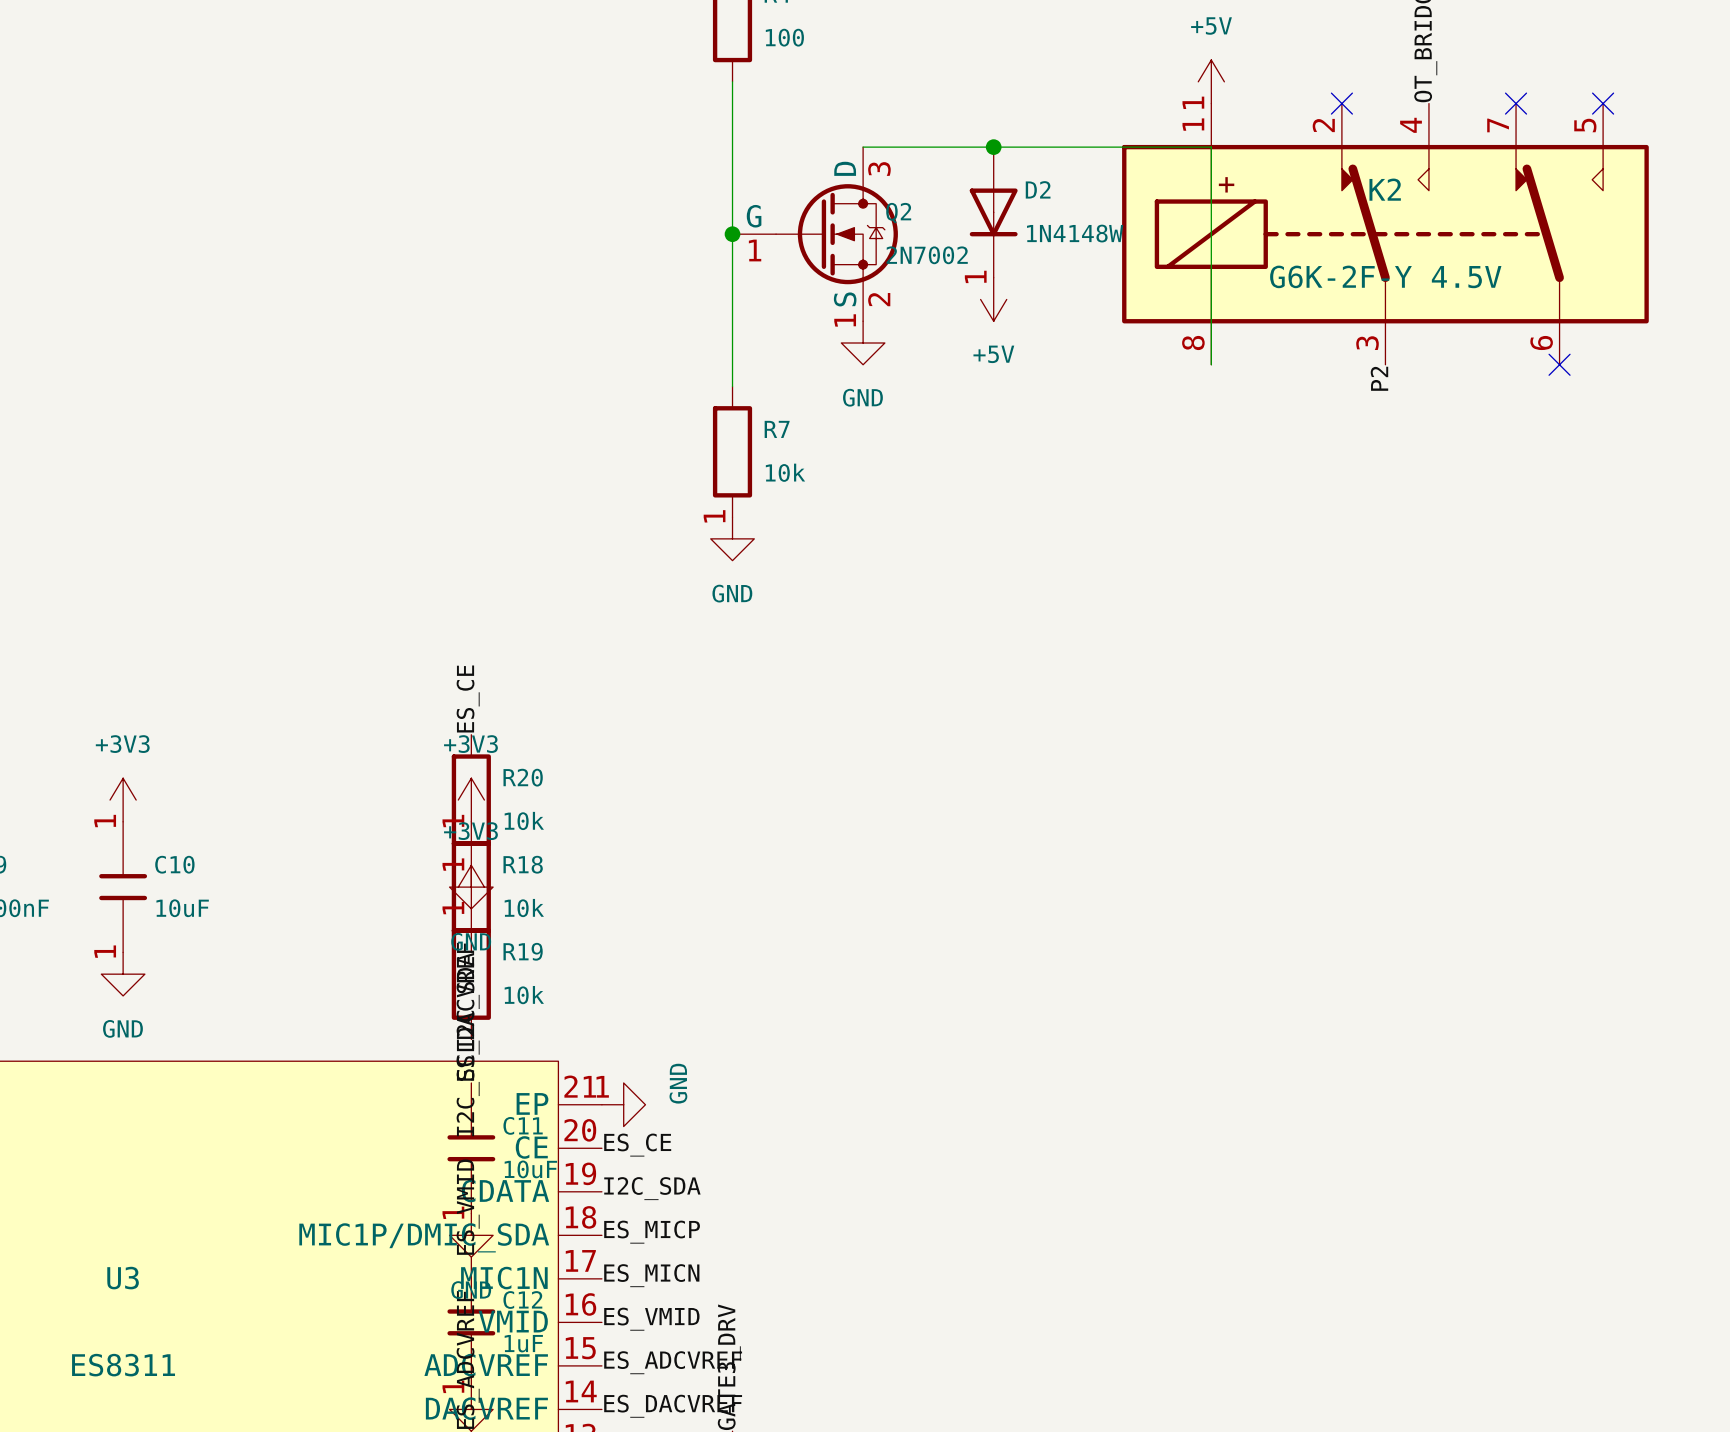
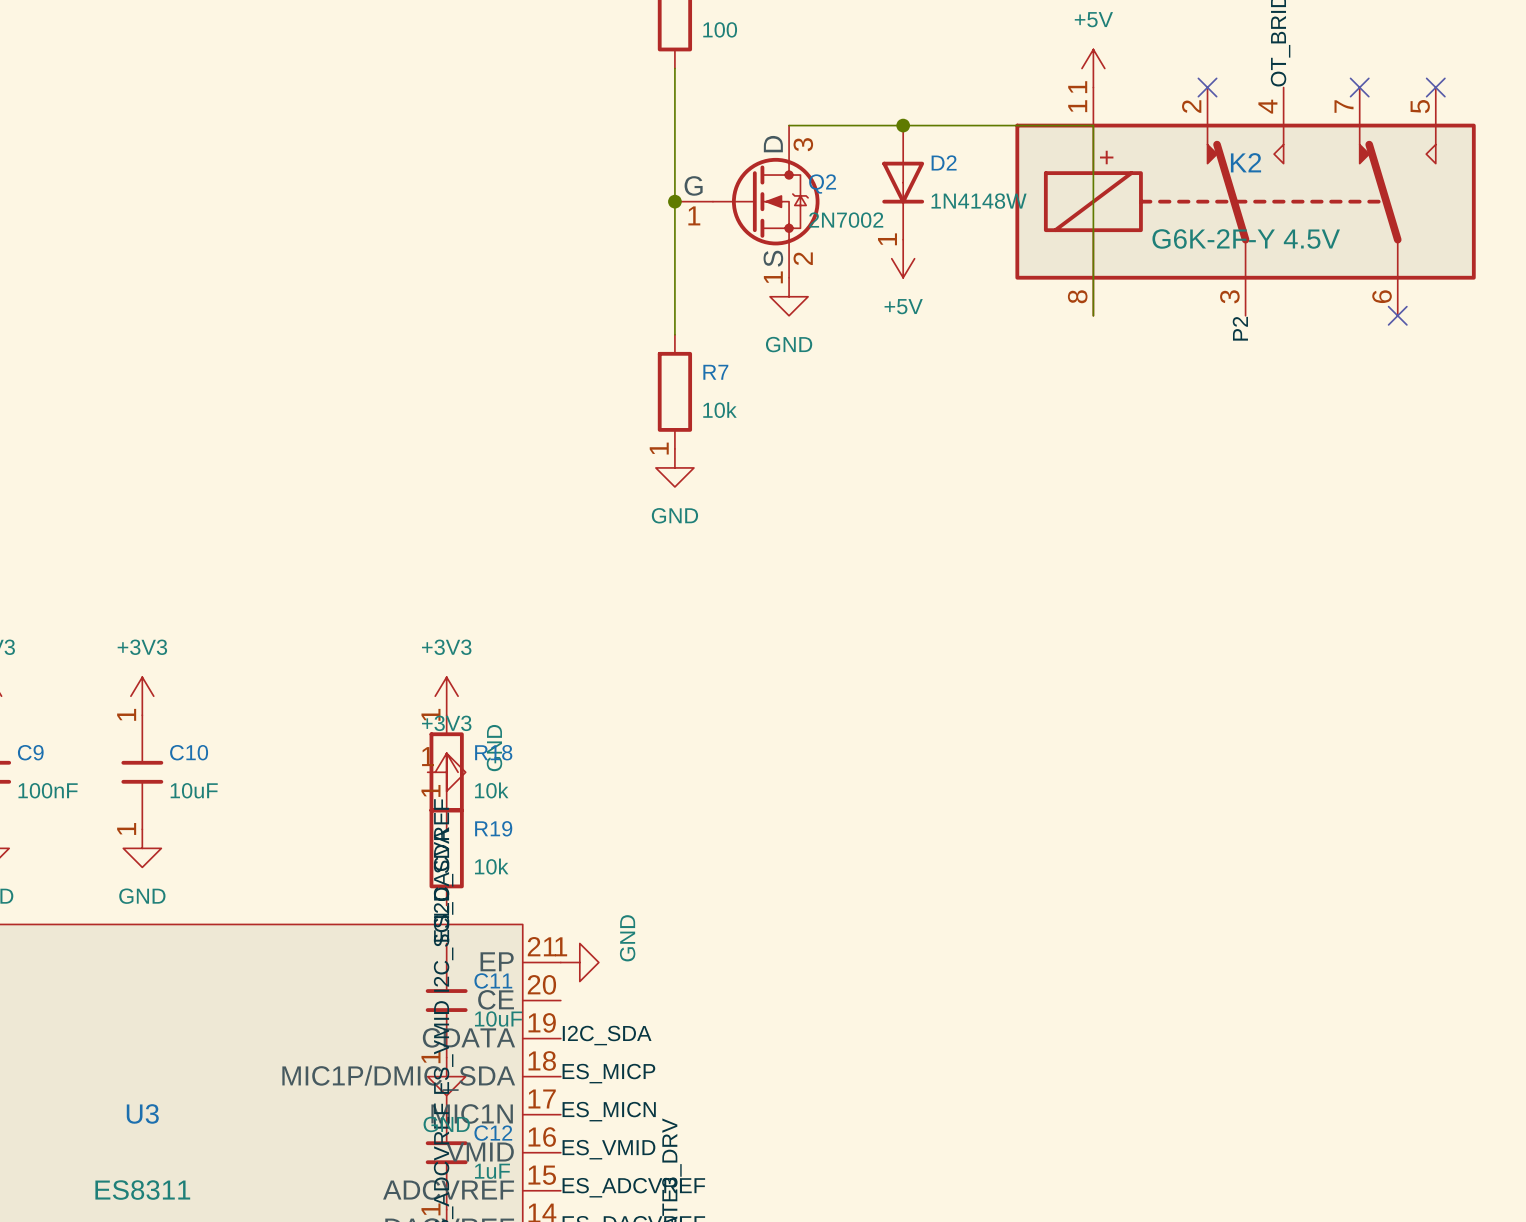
label: ES_CE (468, 699) -> none
R20: 10k (471, 800) -> none
power symbol rotation: 0° (471, 887) -> 90° counterclockwise (446, 772)
label: ES_CE (637, 1145) -> none

